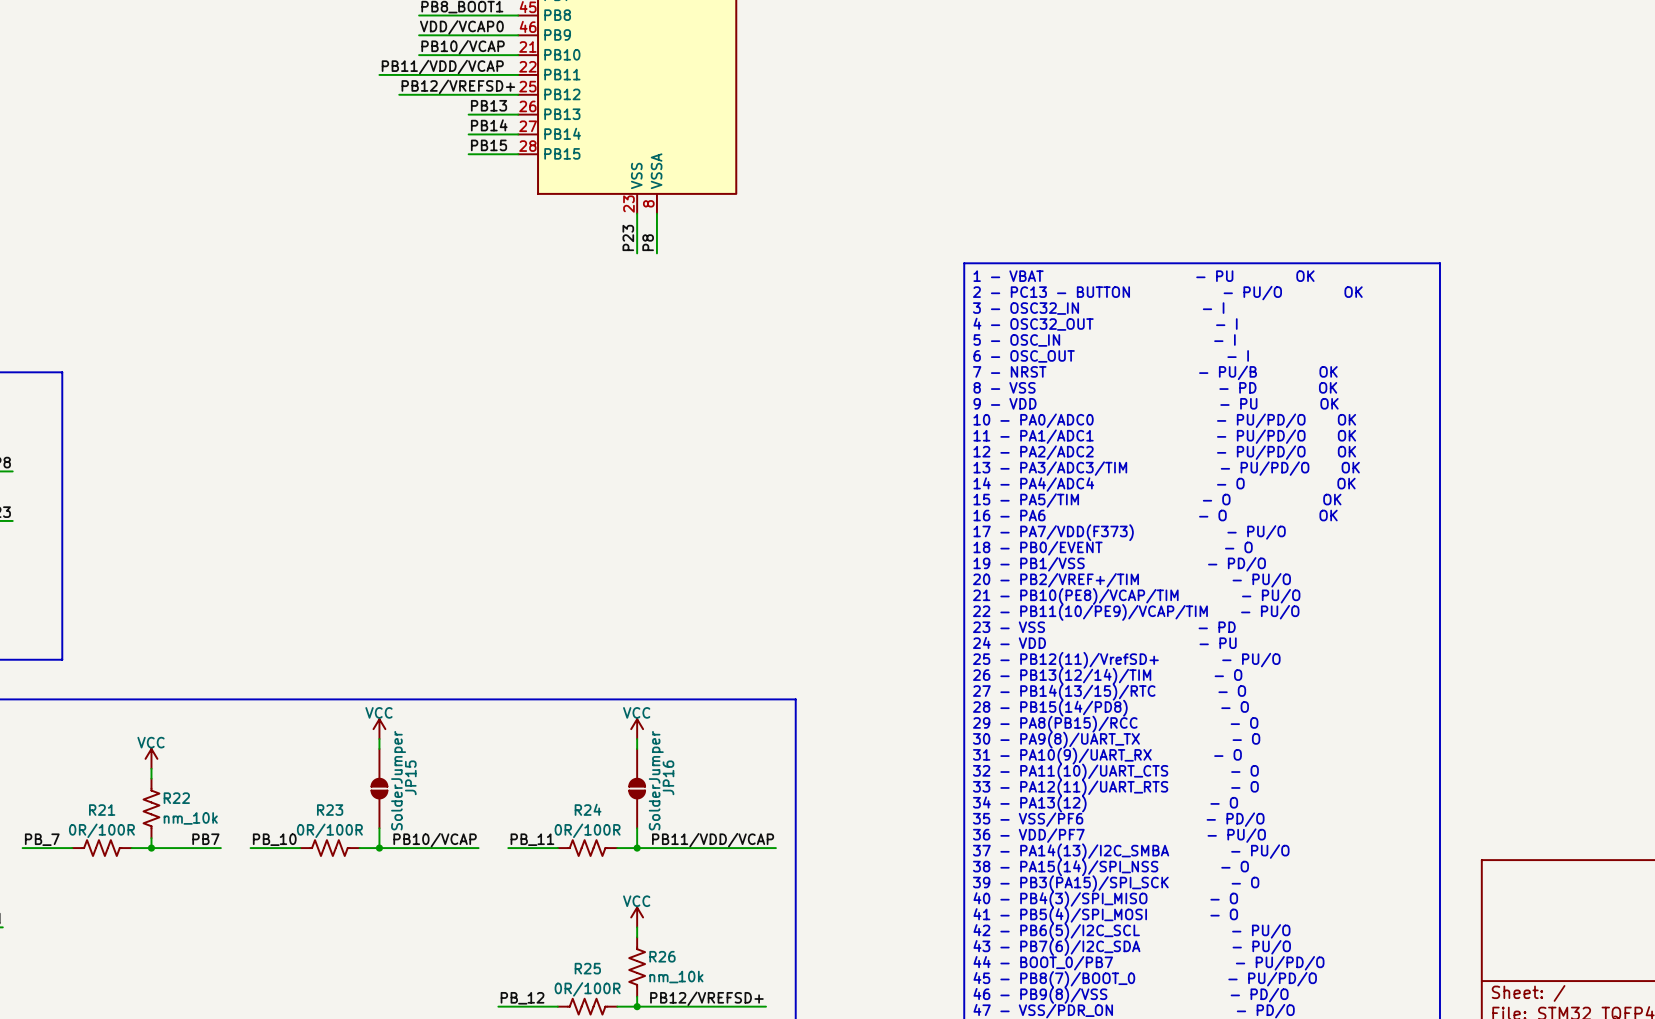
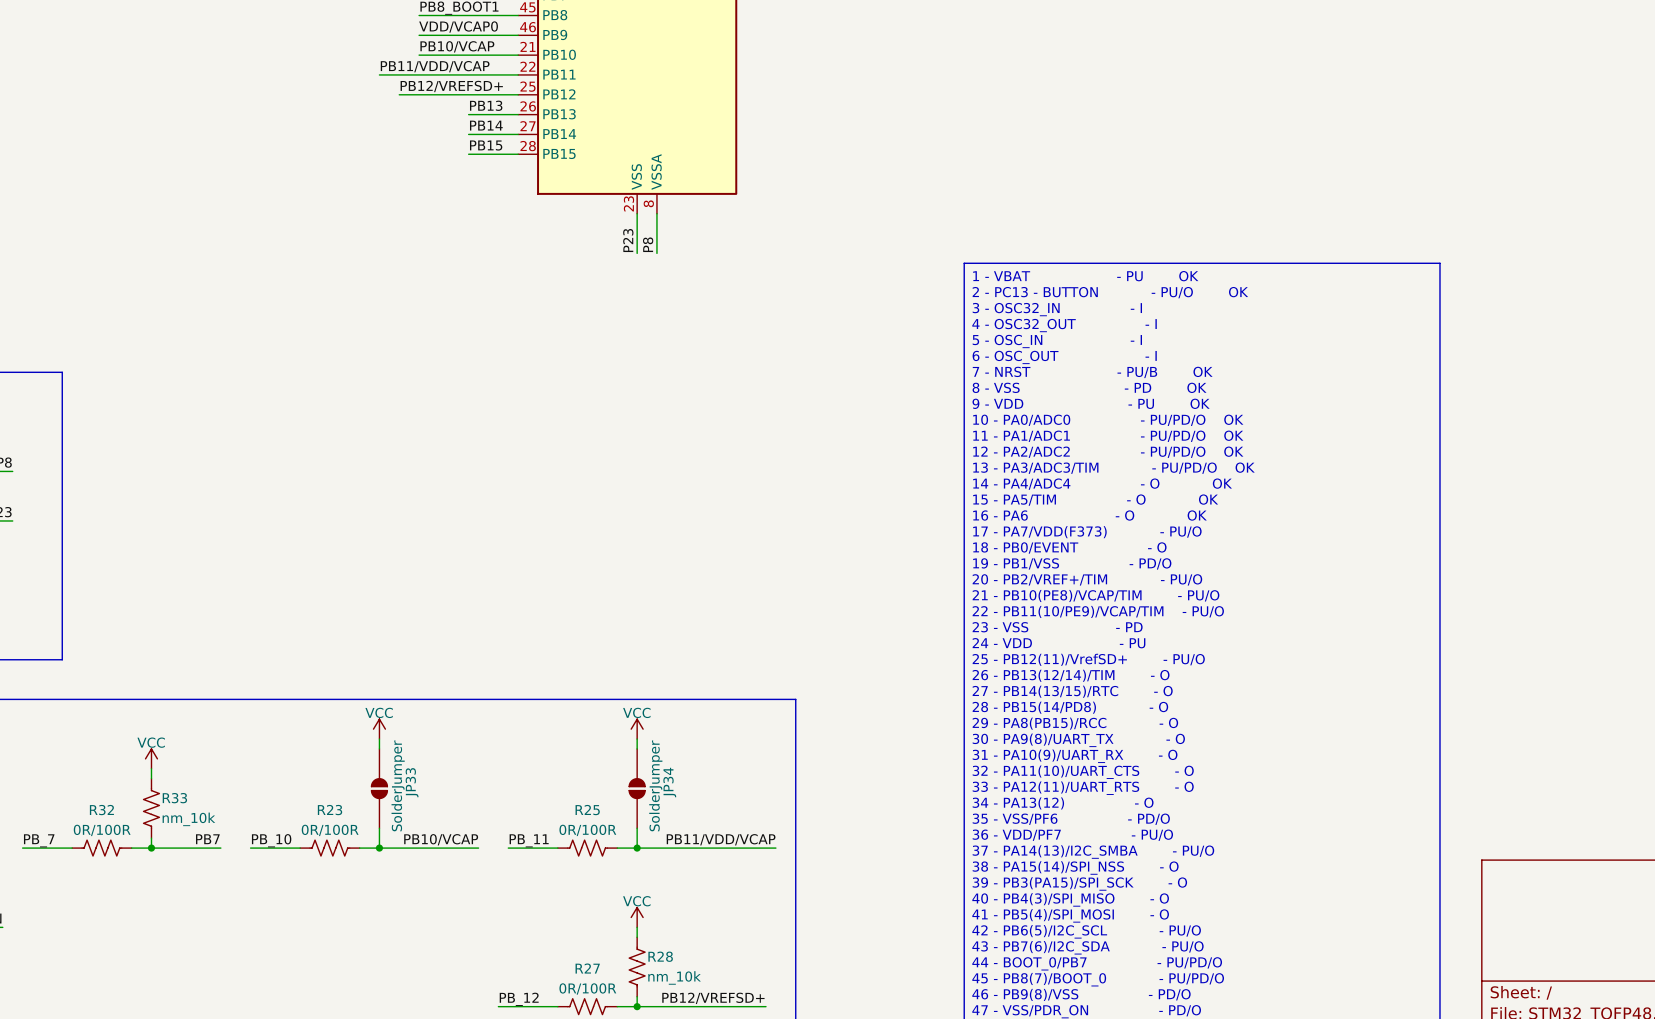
JP15 name: JP15 (410, 777) -> JP33 (412, 782)
JP16 name: JP16 (668, 777) -> JP34 (669, 782)
R22 name: R22 (176, 798) -> R33 (174, 798)
R24 name: R24 (588, 809) -> R25 (587, 810)
R21 name: R21 (102, 810) -> R32 (101, 810)
R26 name: R26 (662, 956) -> R28 (660, 956)
R25 name: R25 (587, 968) -> R27 (587, 968)

